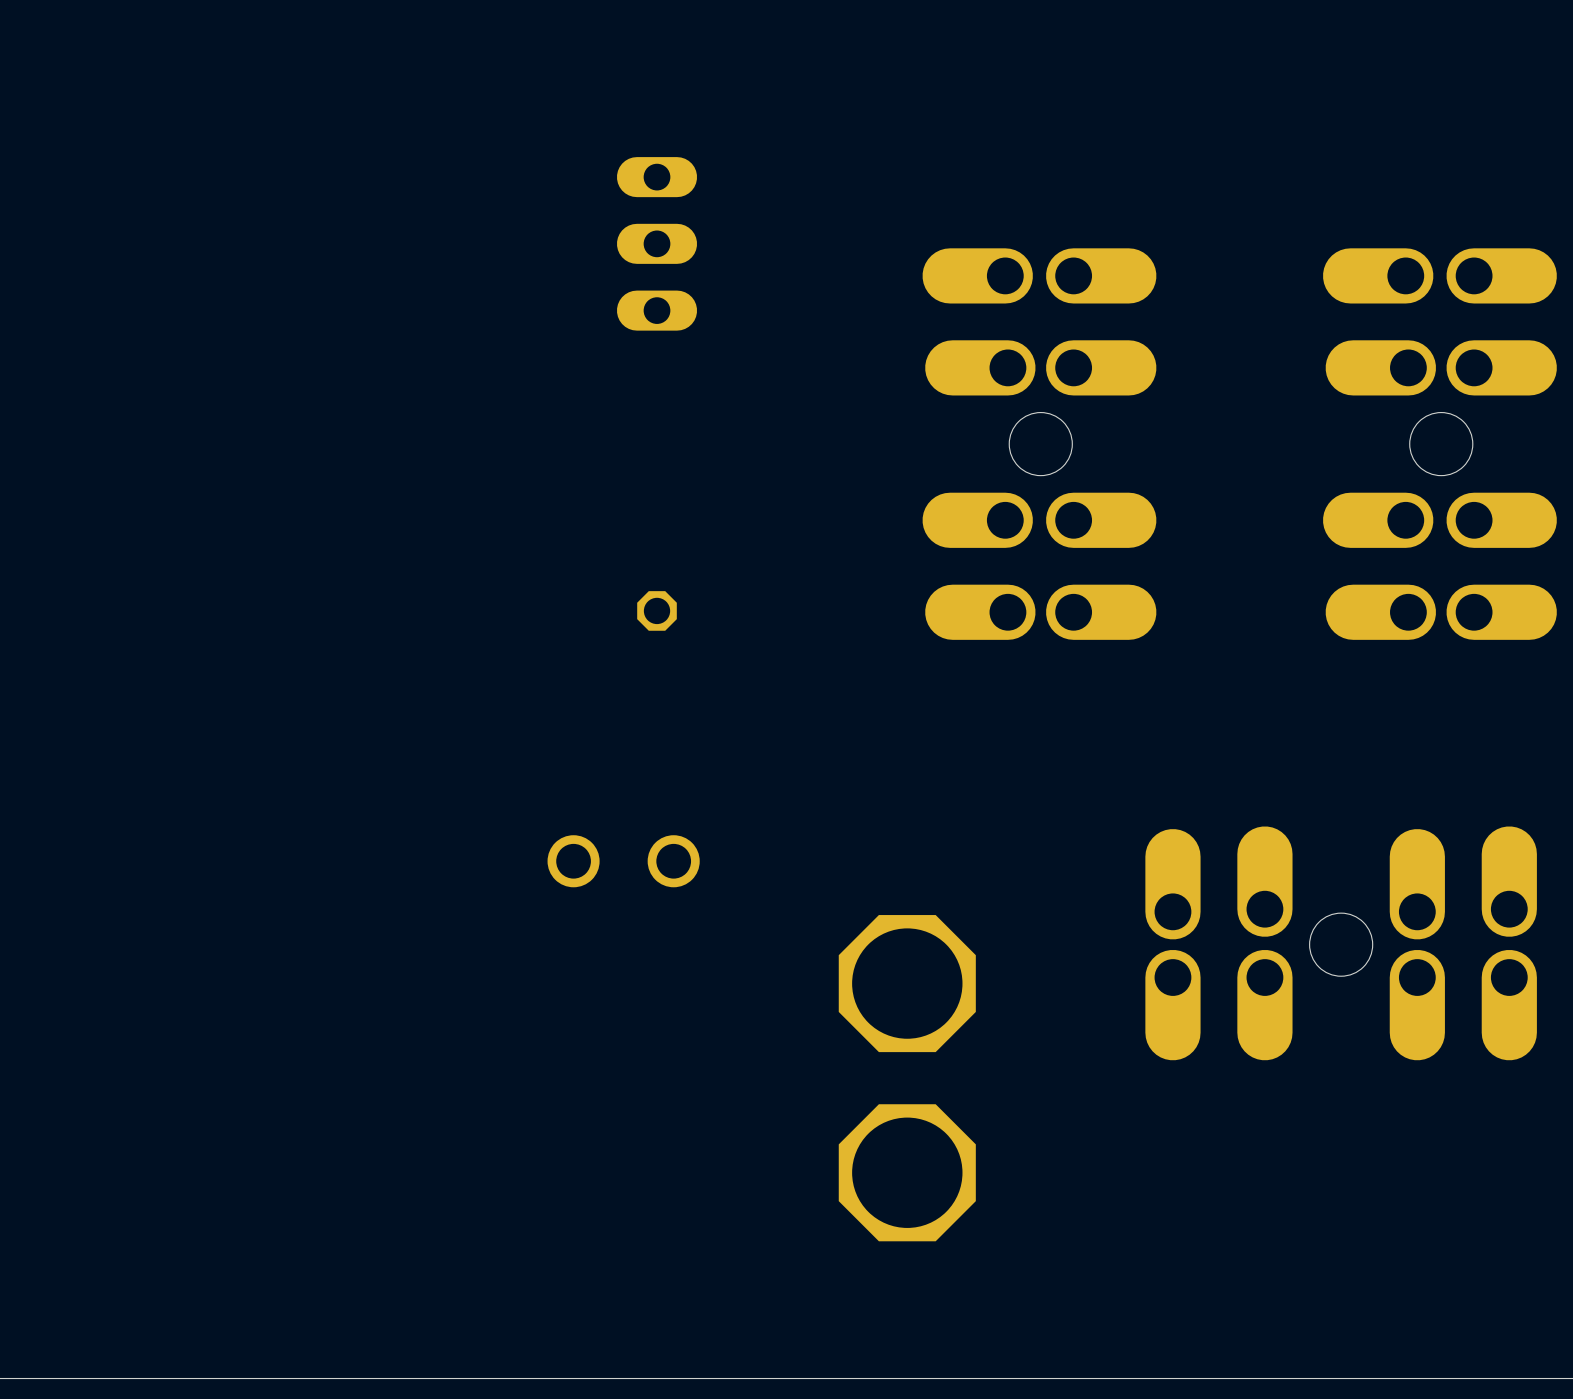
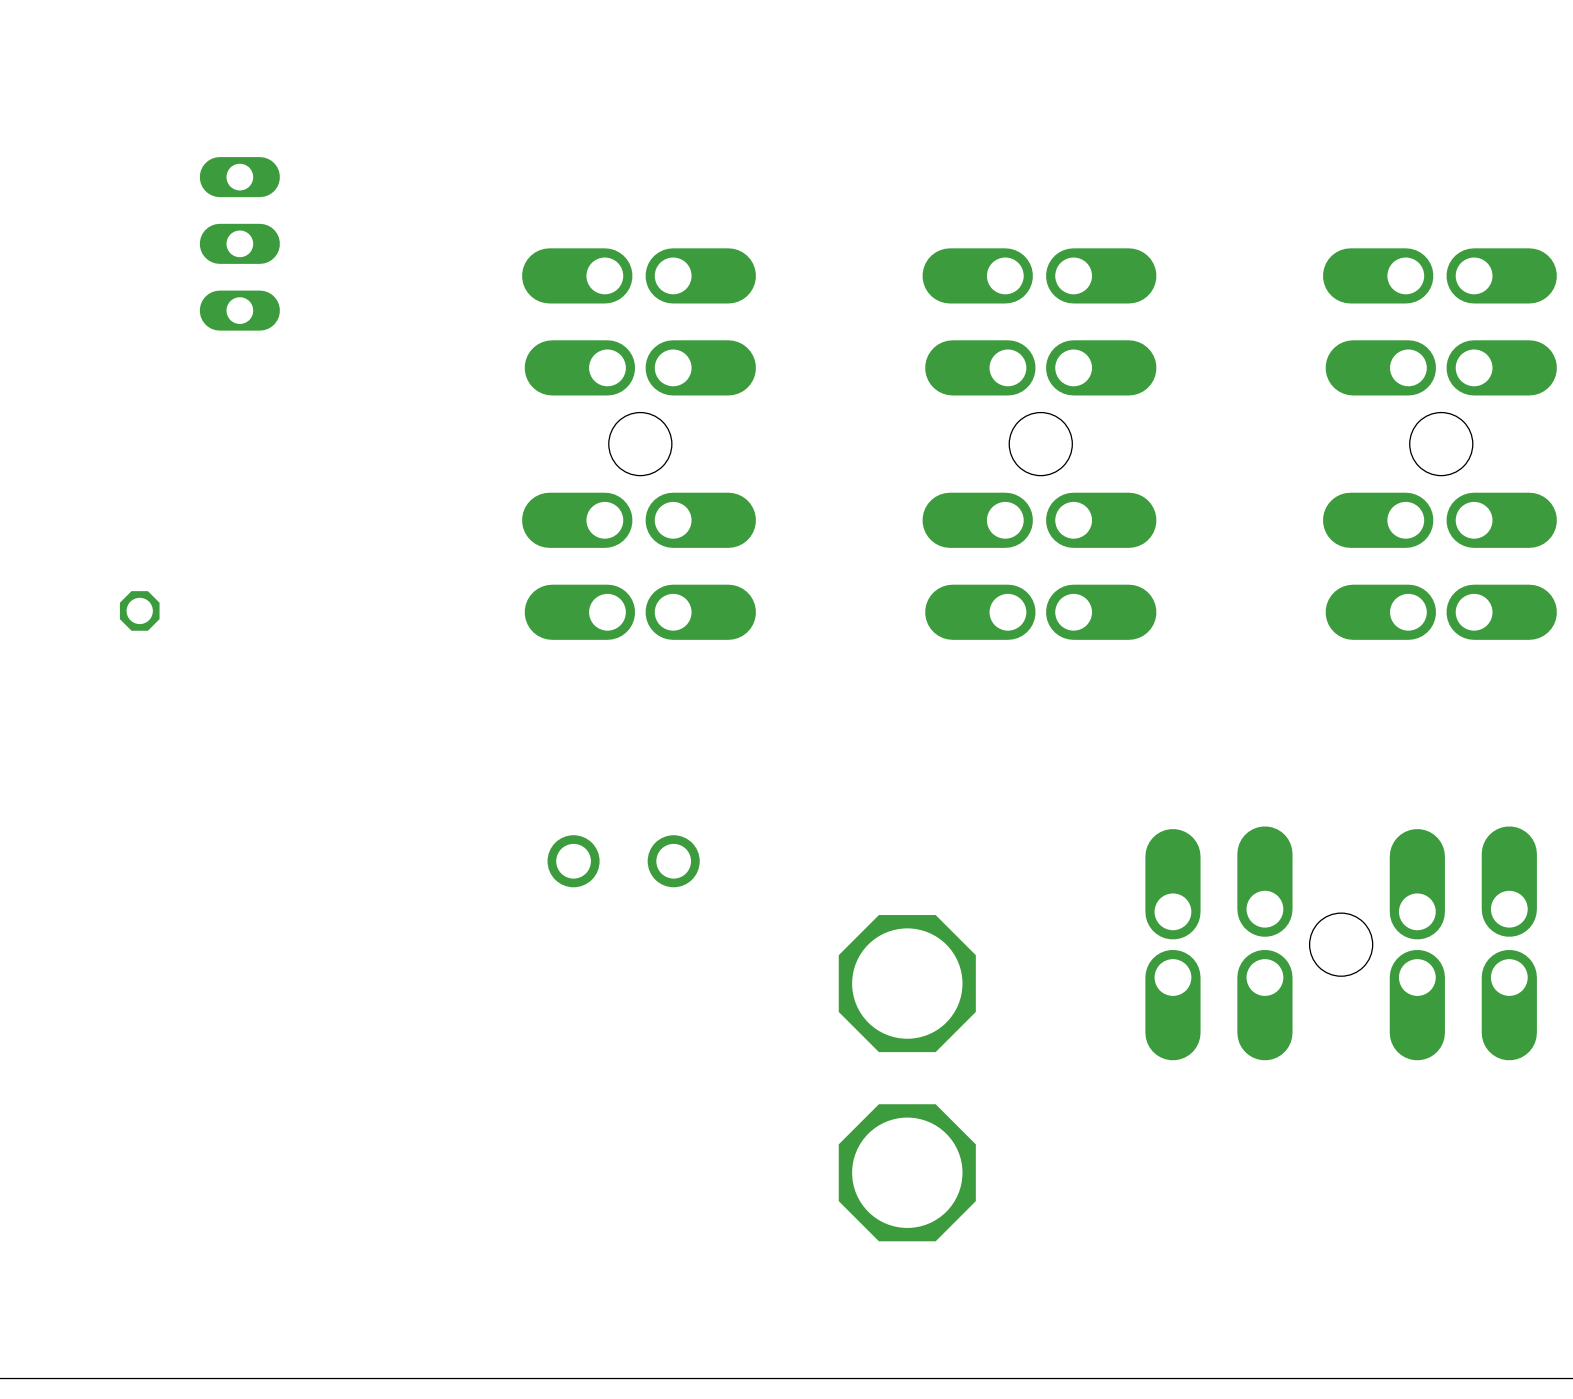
part position: (657, 243) -> (239, 243)
part: none -> (639, 444)
part position: (657, 610) -> (139, 610)

